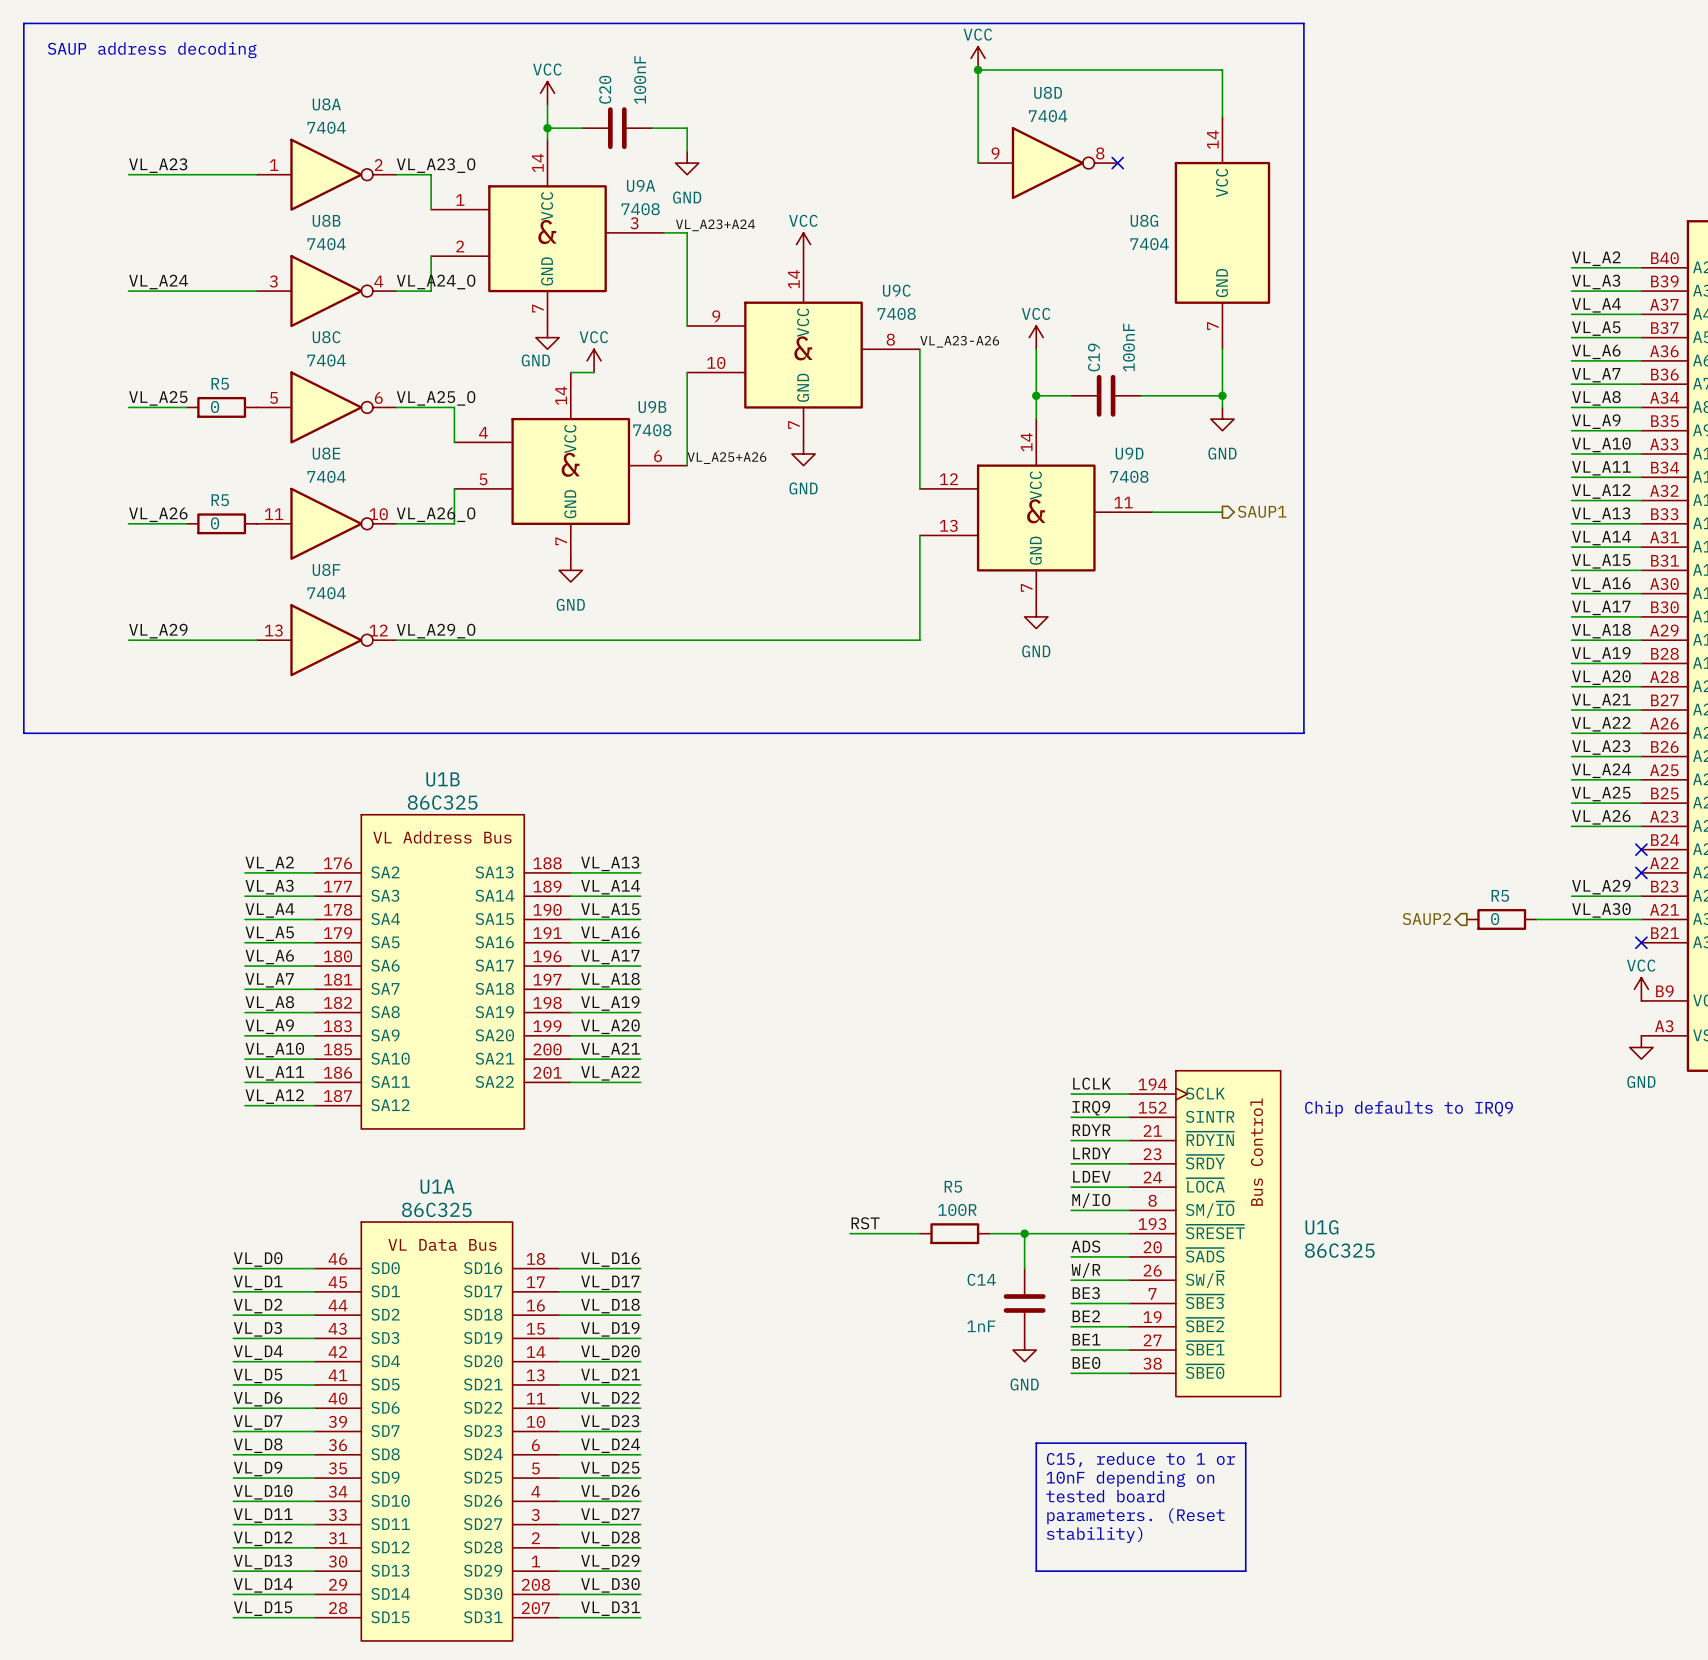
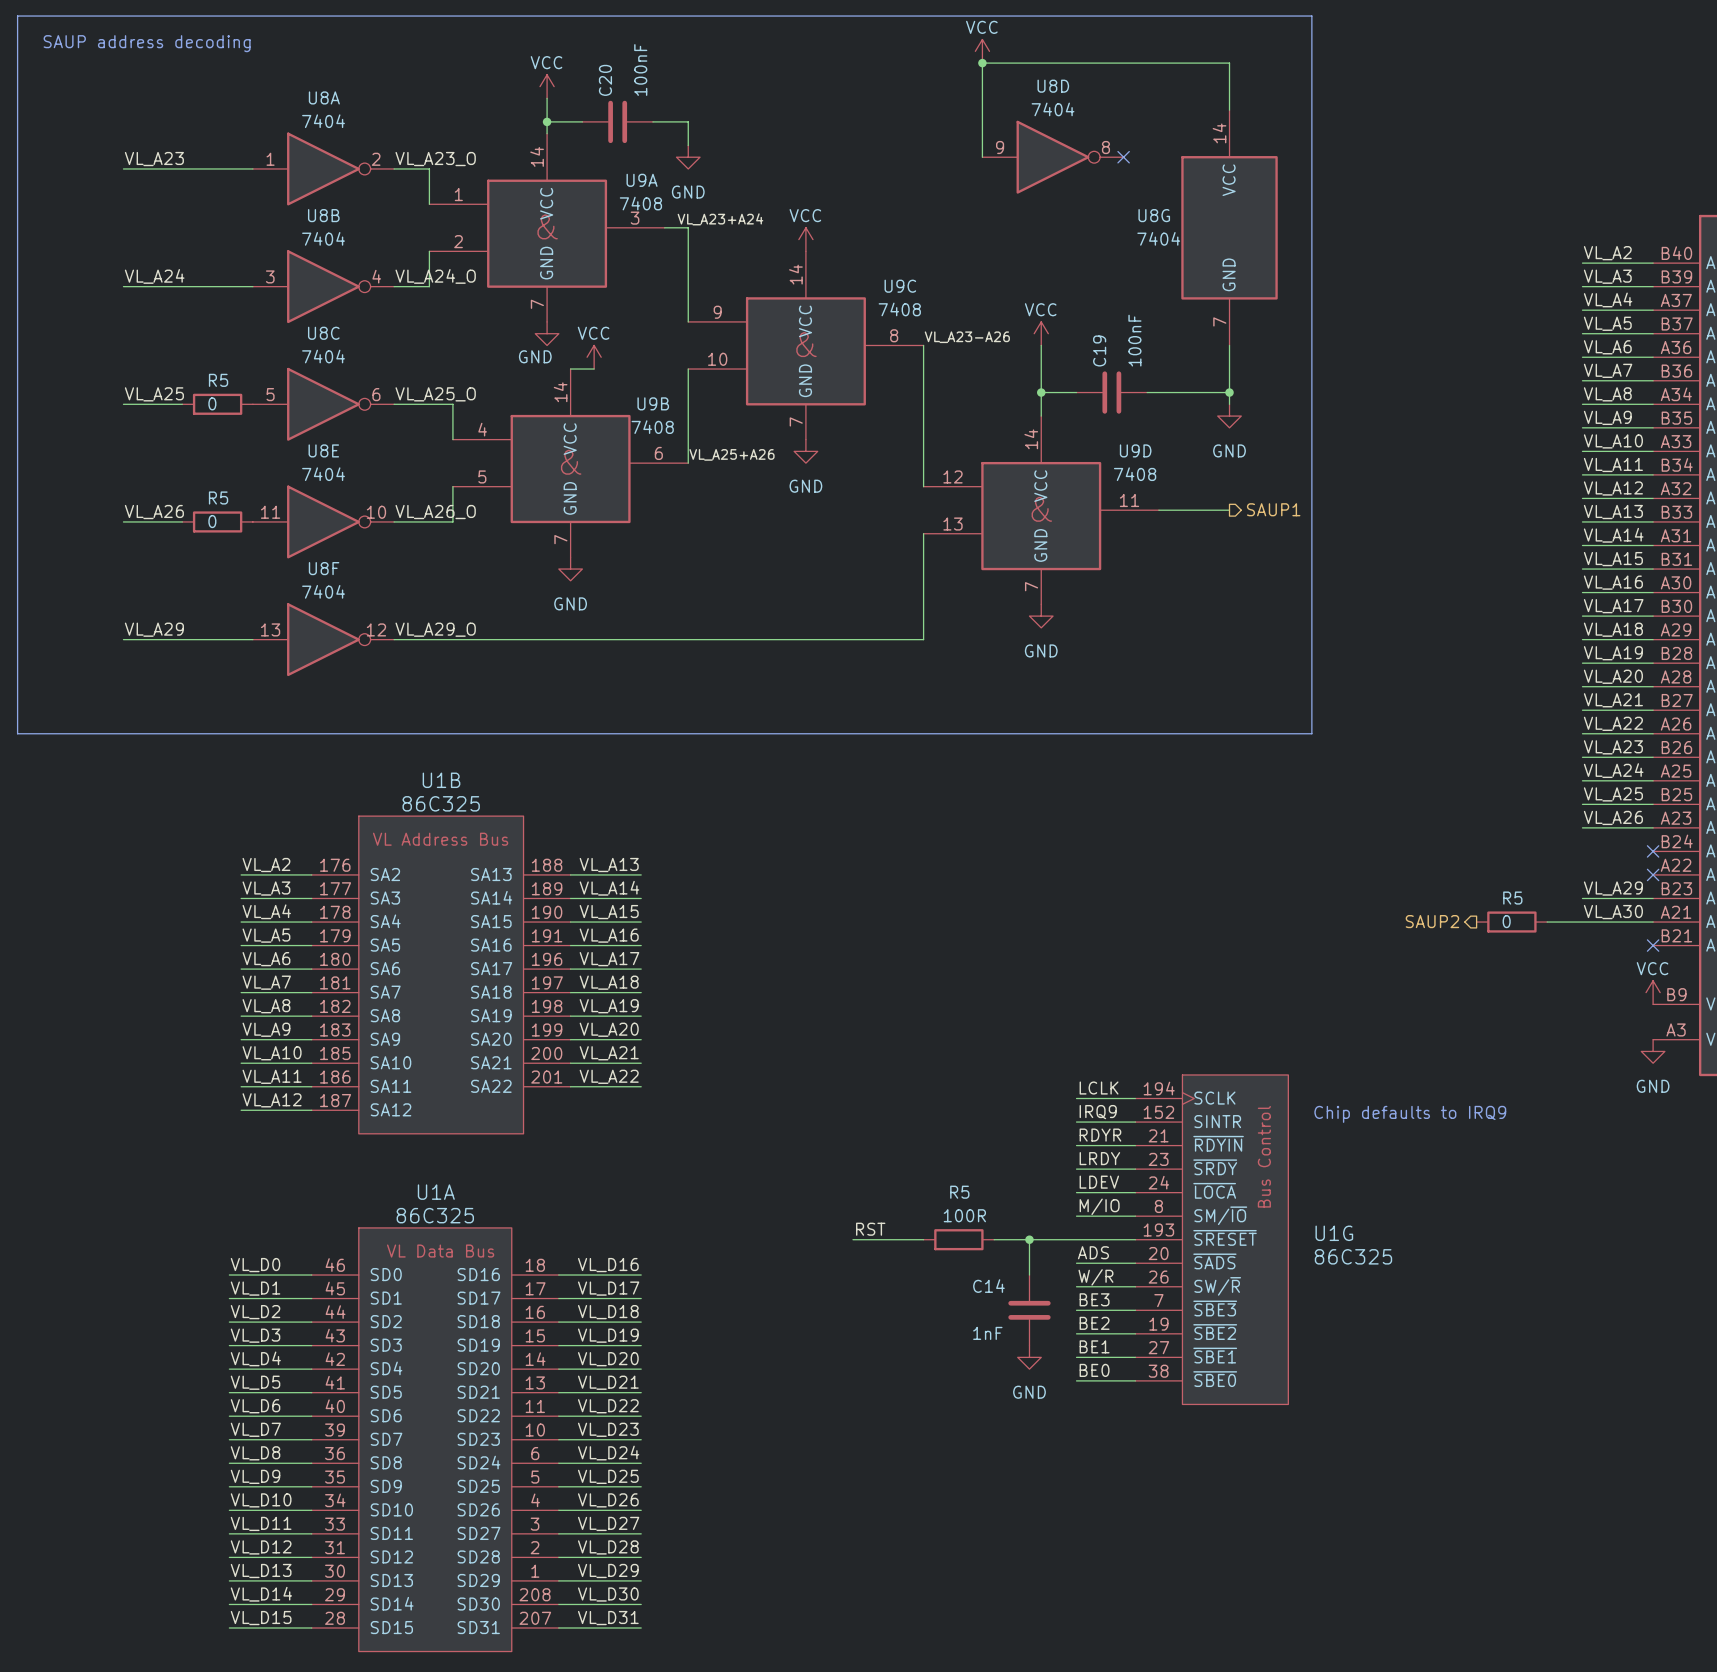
line: (1036, 1443) (1245, 1443) (1245, 1571) (1036, 1571) (1036, 1443) -> none
text: C15, reduce to 1 or (1140, 1459) -> none
text: 10nF depending on (1130, 1479) -> none
text: tested board (1105, 1496) -> none
text: parameters. (Reset (1135, 1516) -> none
text: stability) (1094, 1535) -> none

